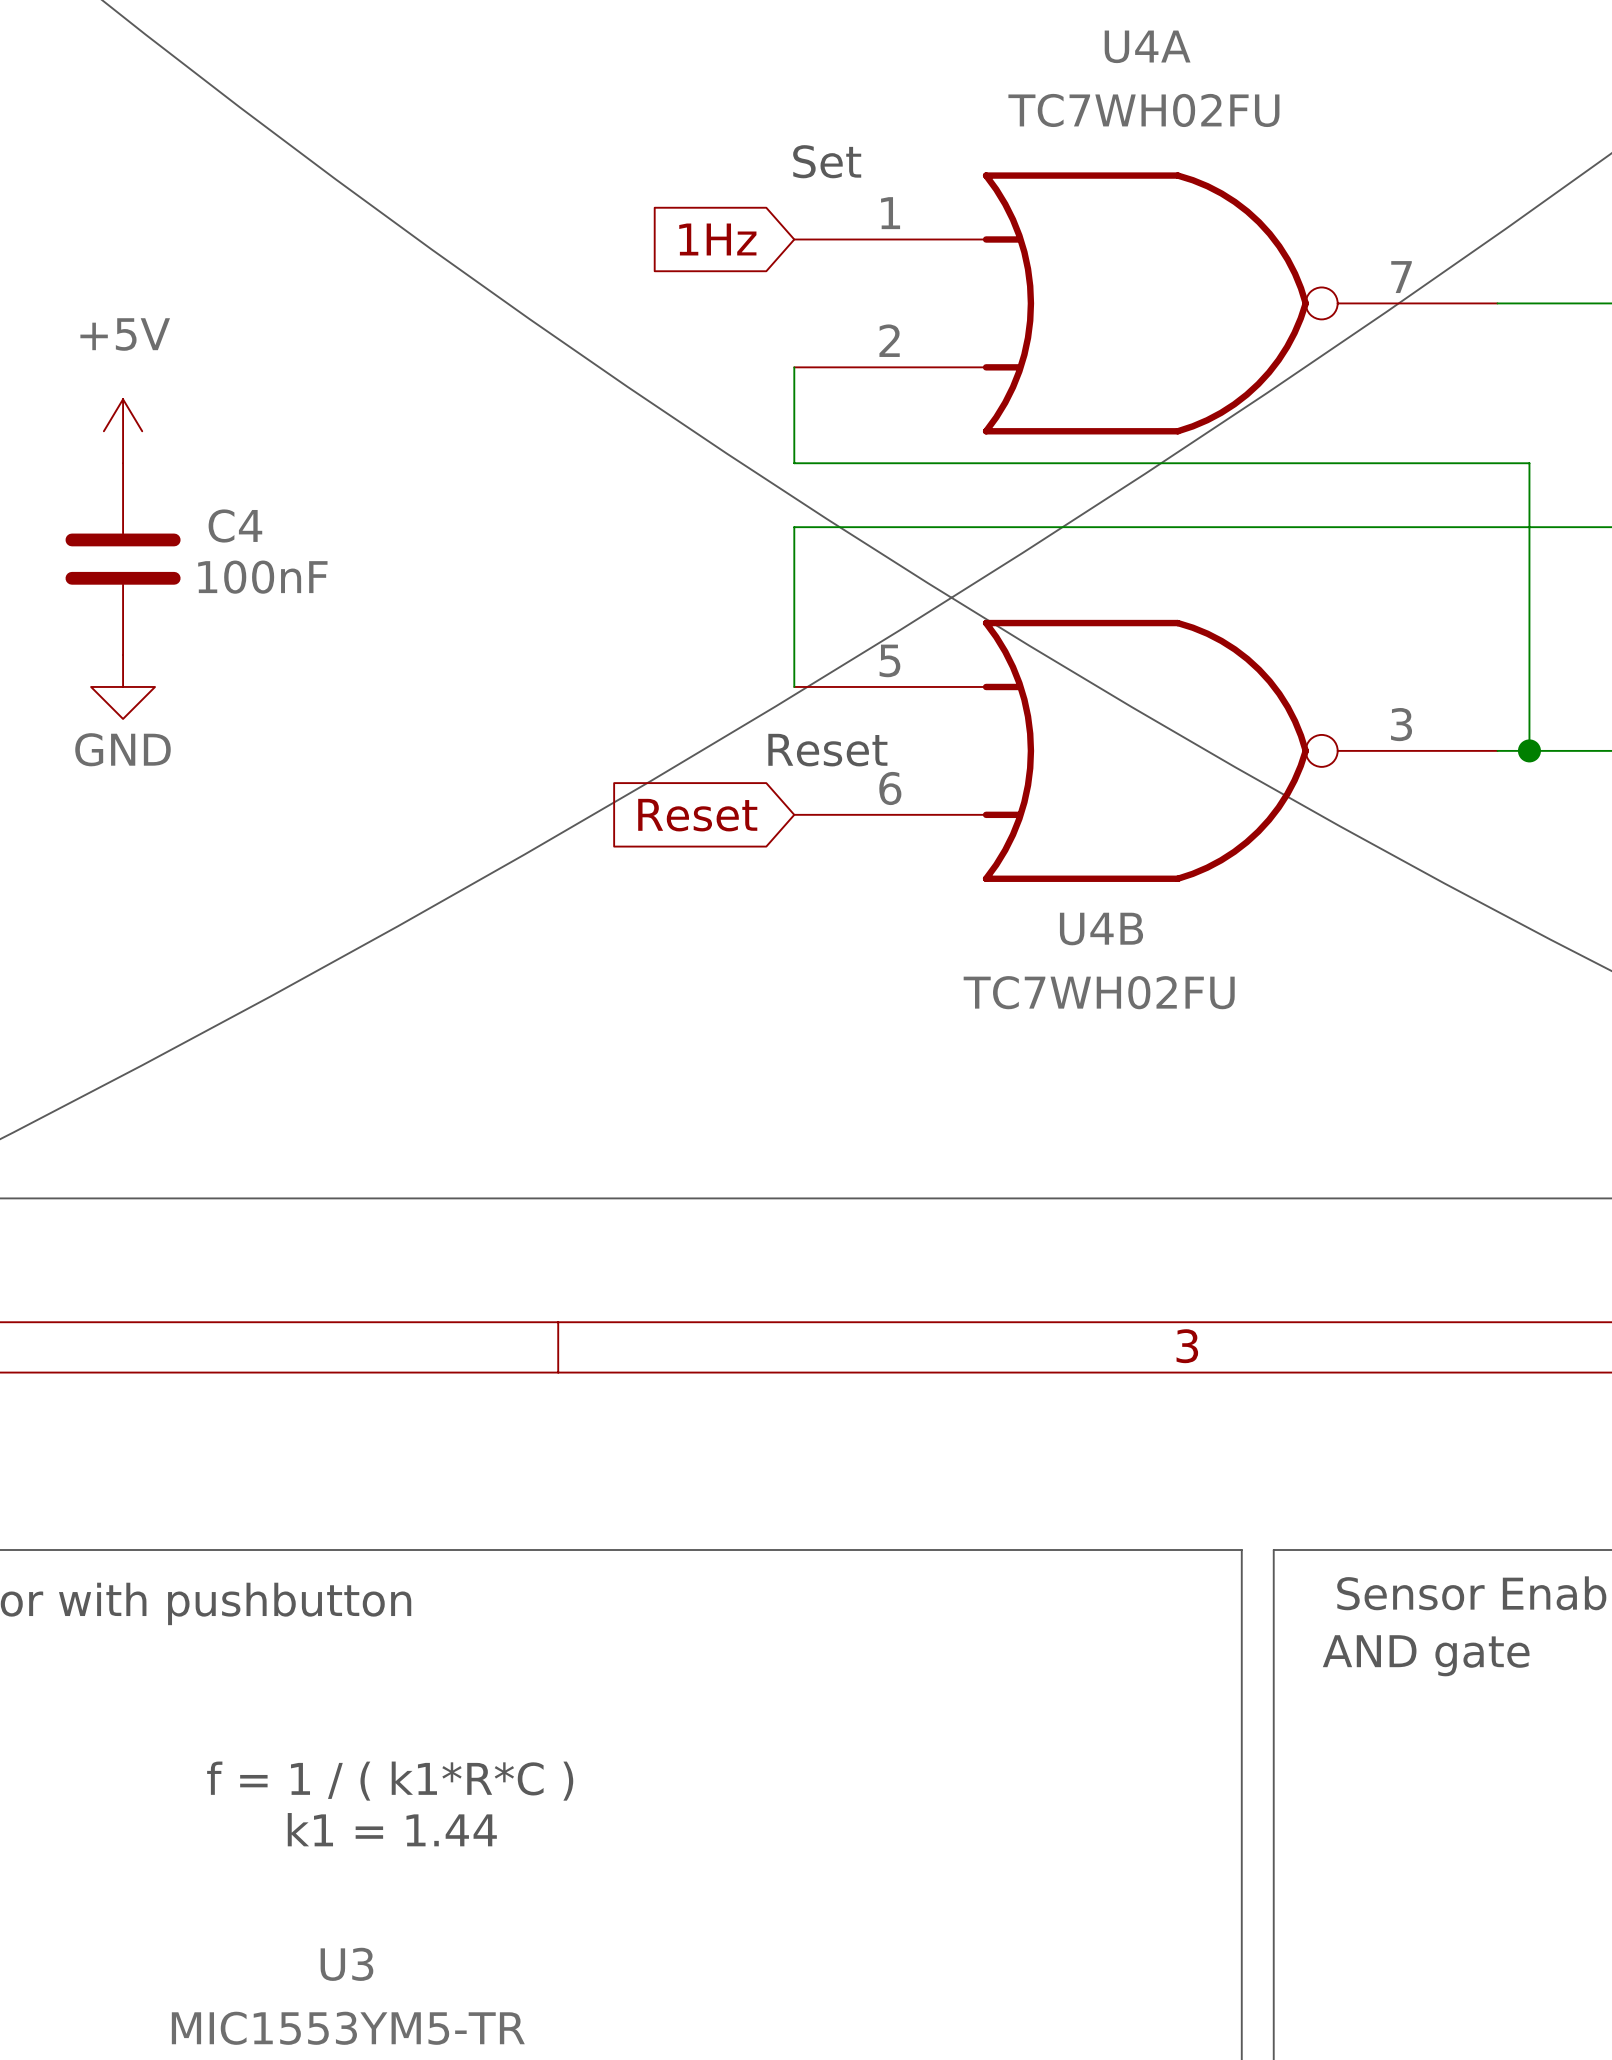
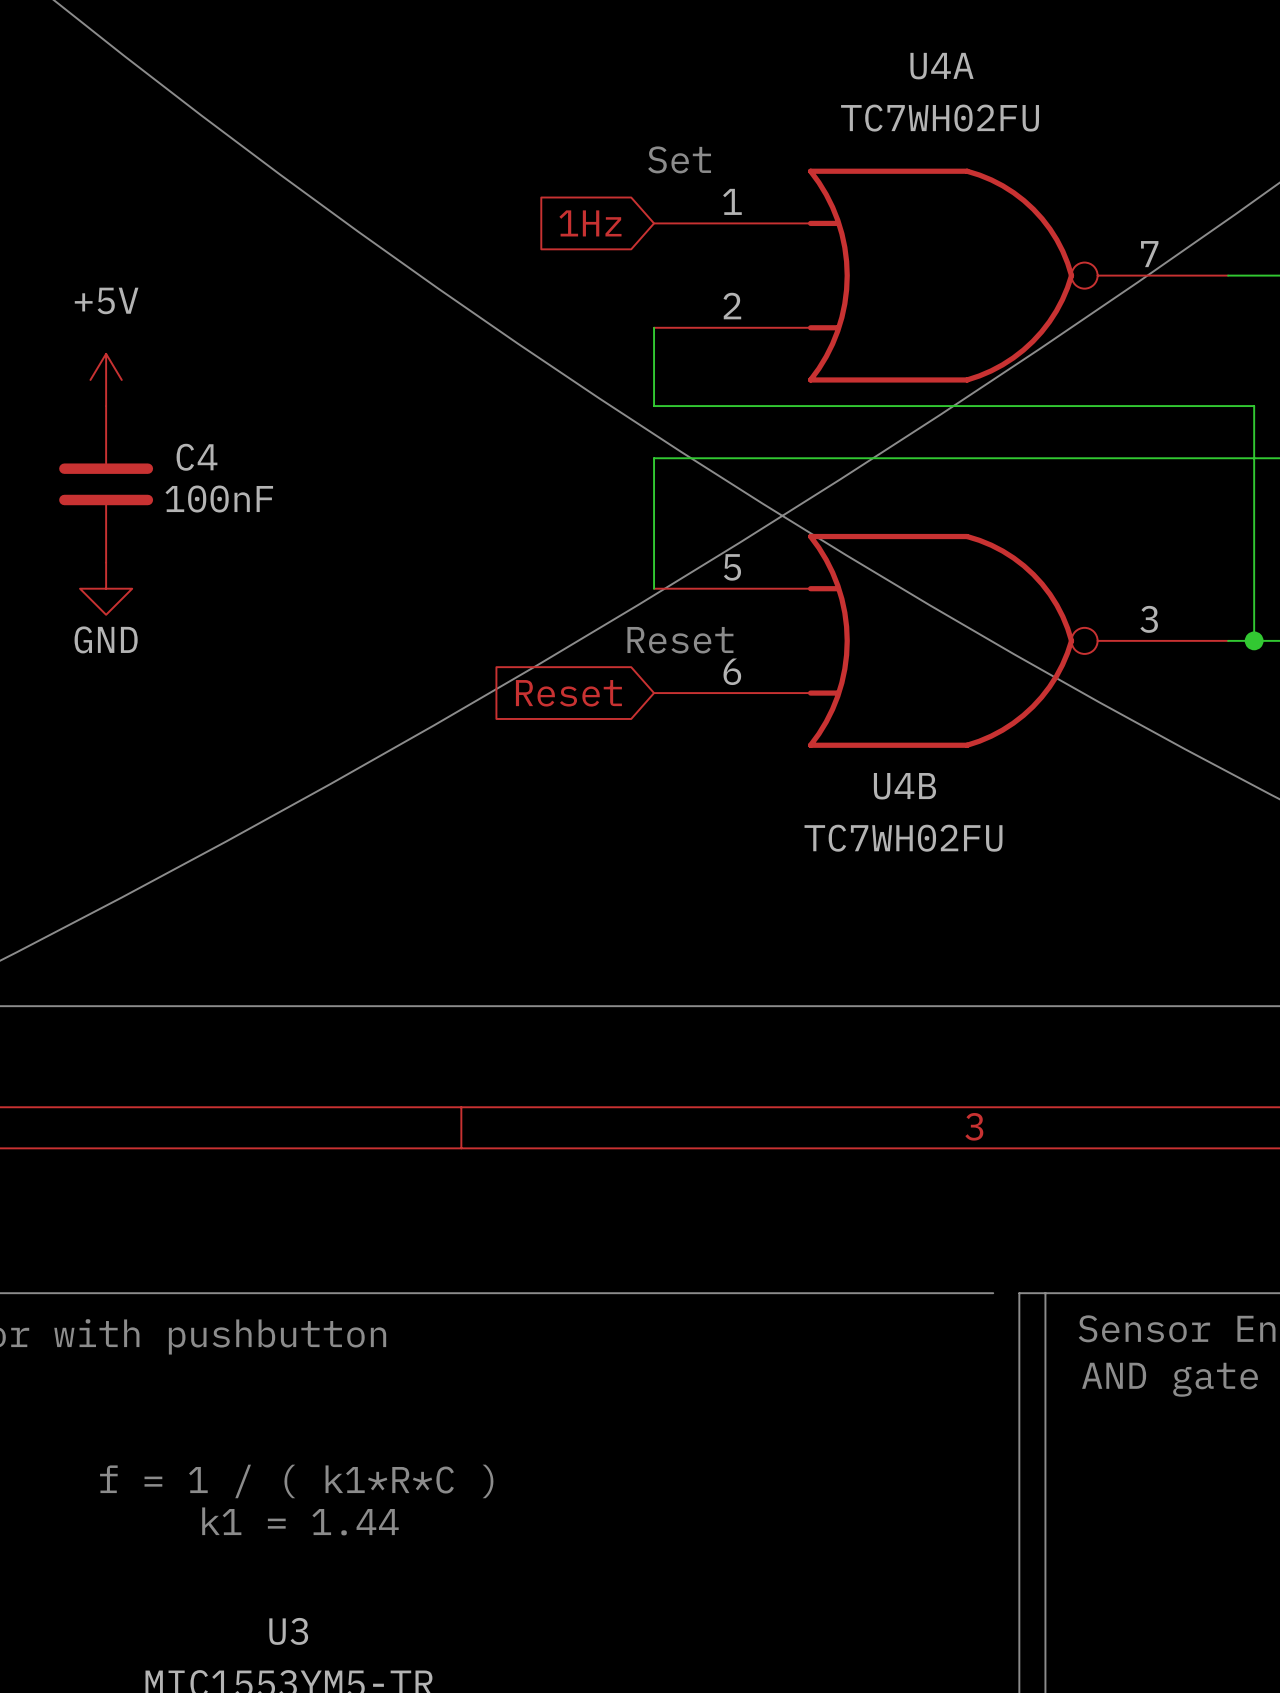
line: (1209, 1550) (1241, 1550) -> (1045, 1293) (1019, 1293)
text position: f = 1 / ( k1*R*C ) (390, 1781) -> f = 1 / ( k1*R*C ) (296, 1481)
text position: k1 = 1.44 (392, 1829) -> k1 = 1.44 (300, 1521)

